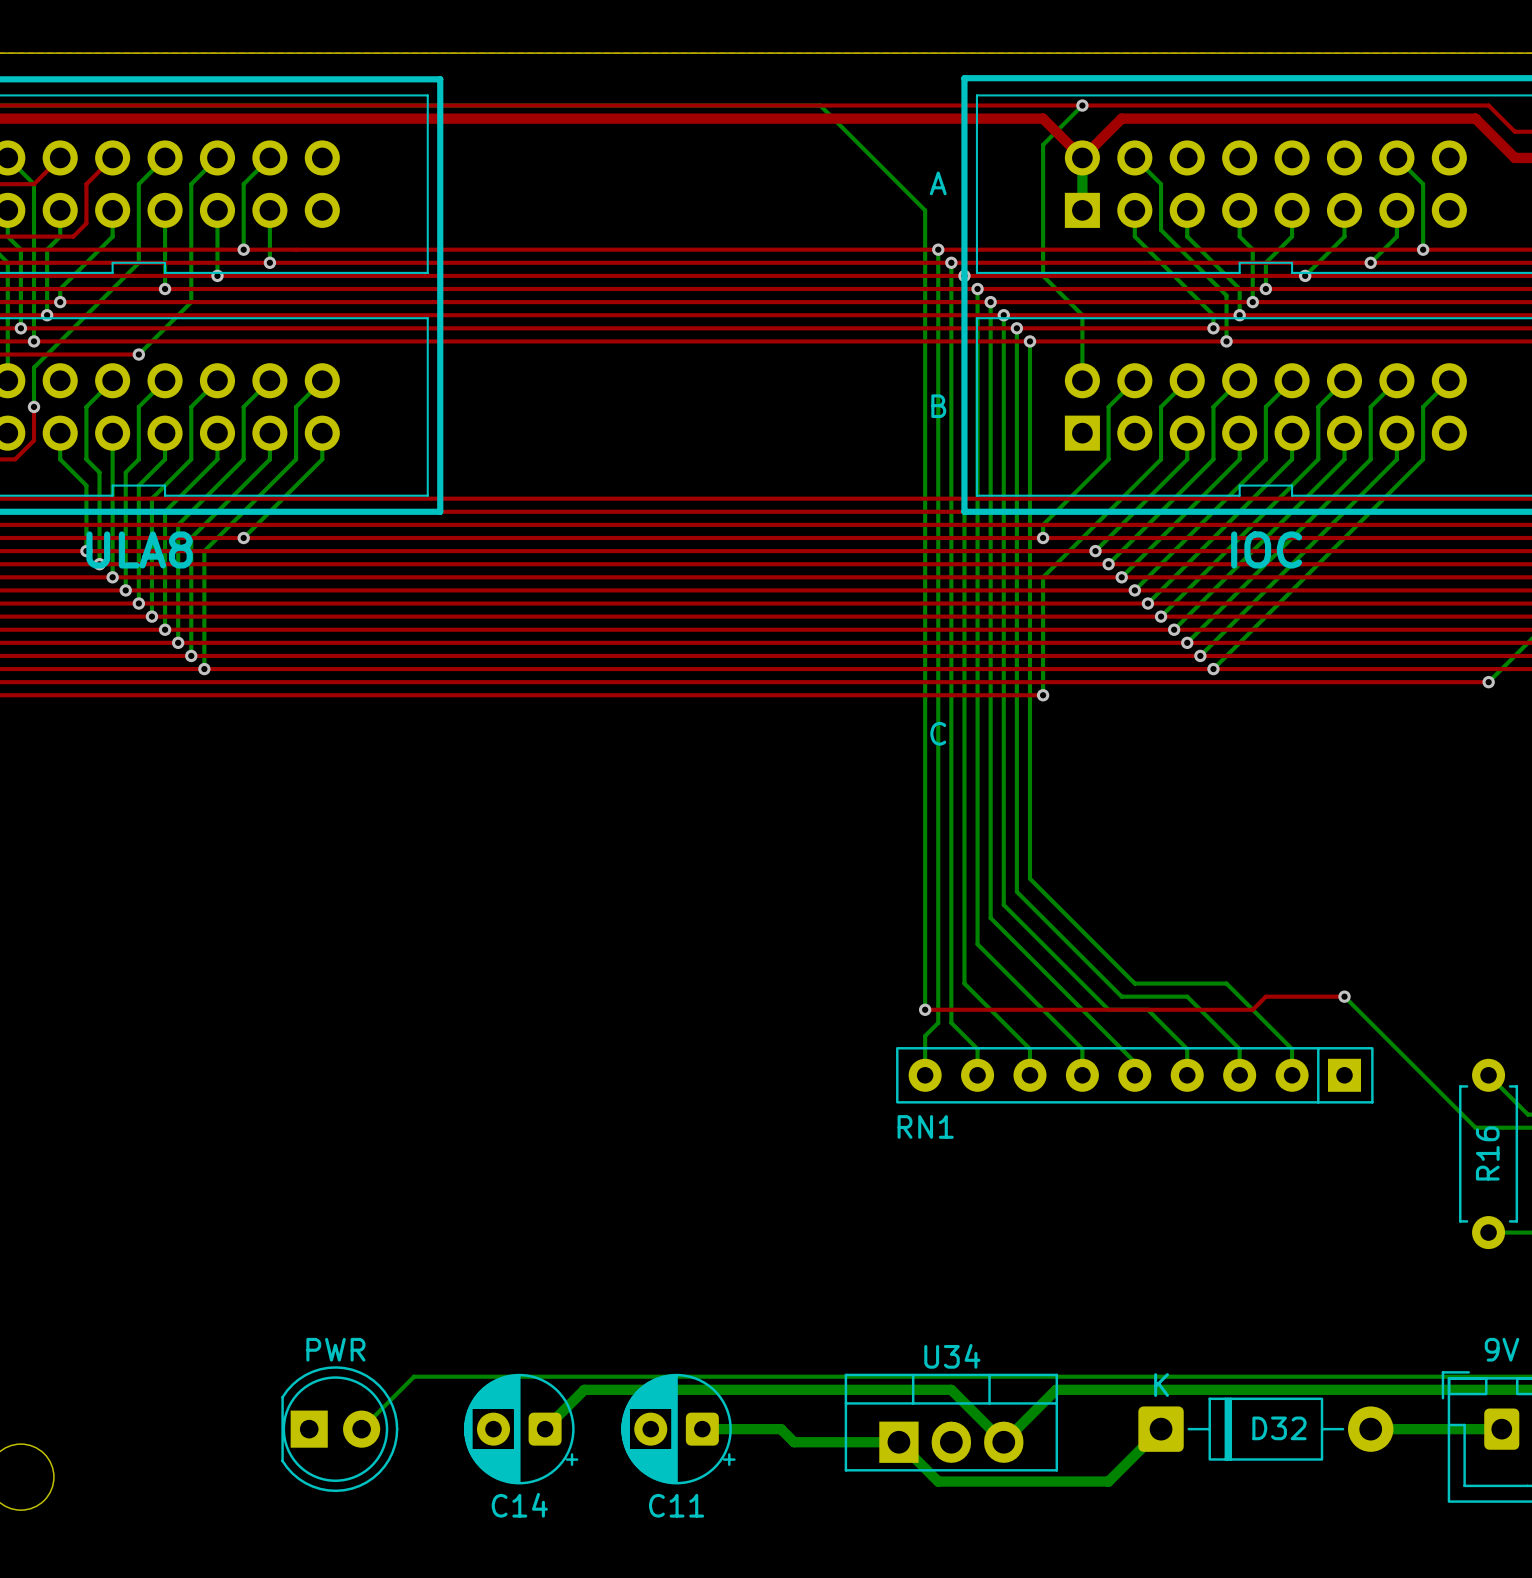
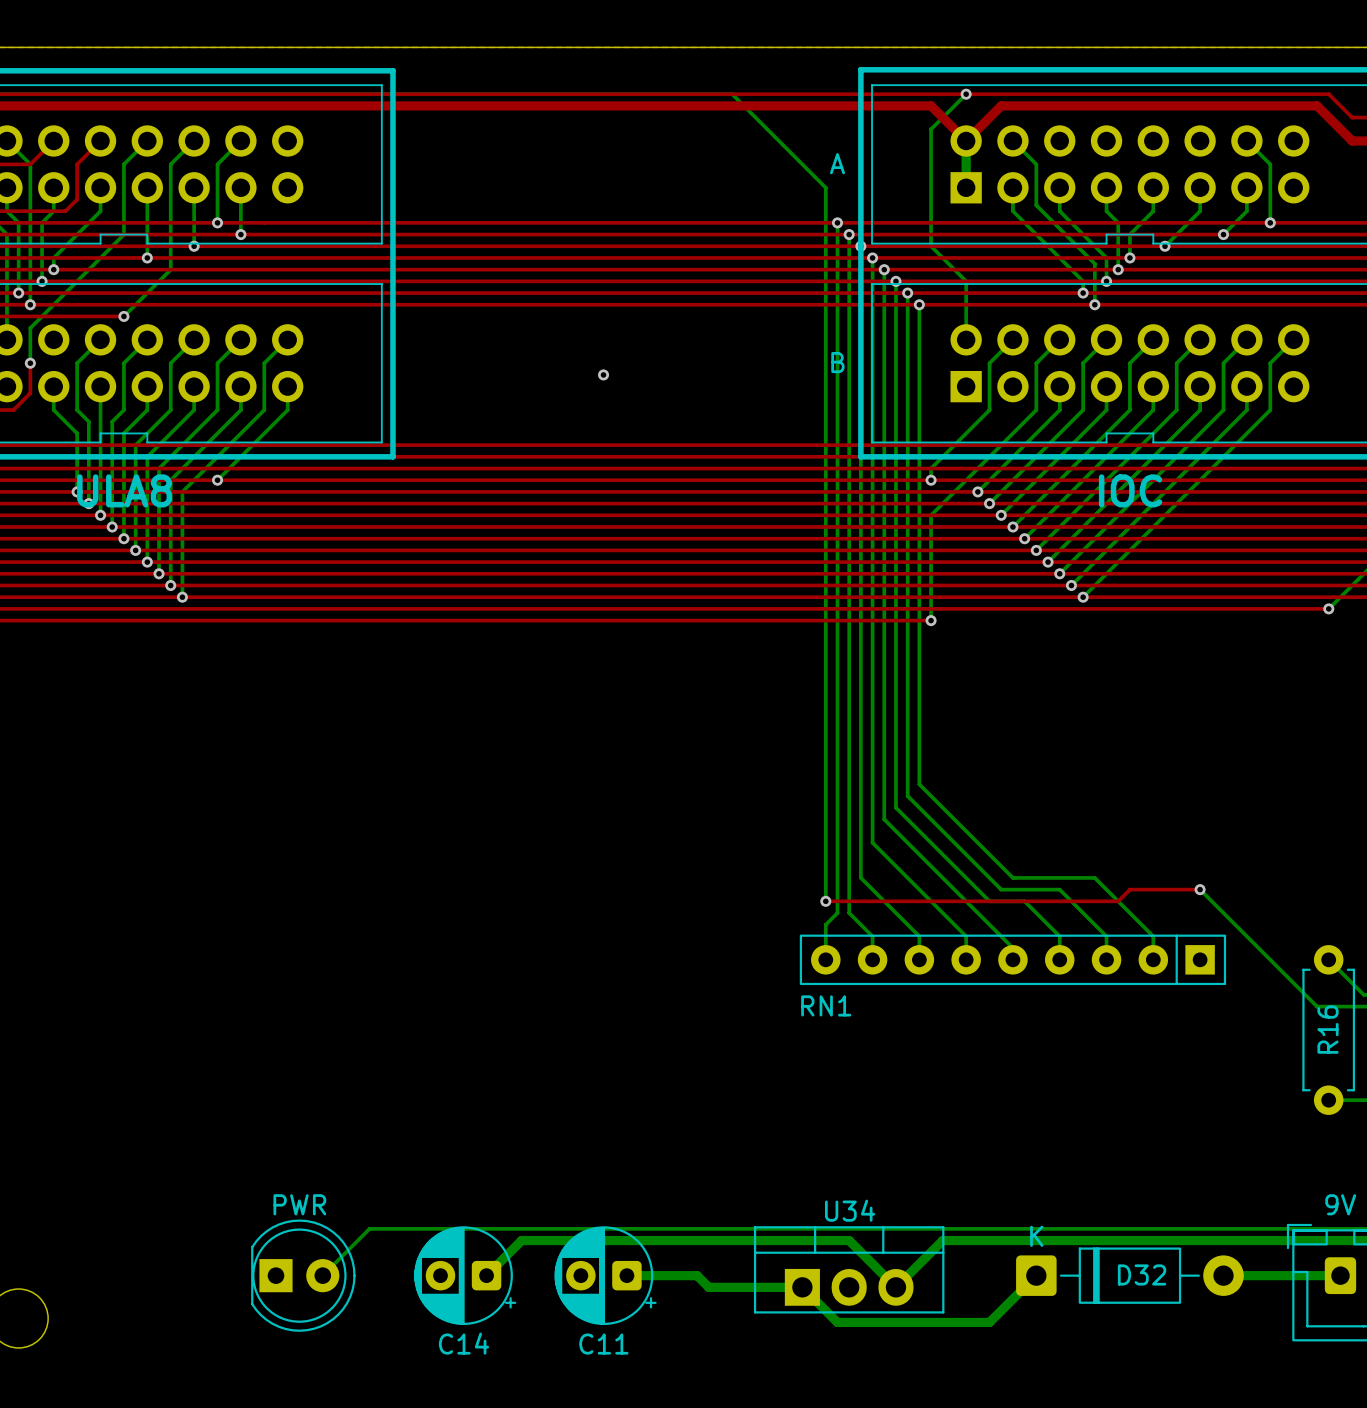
via: none -> (603, 374)
text: C (938, 733) -> none

